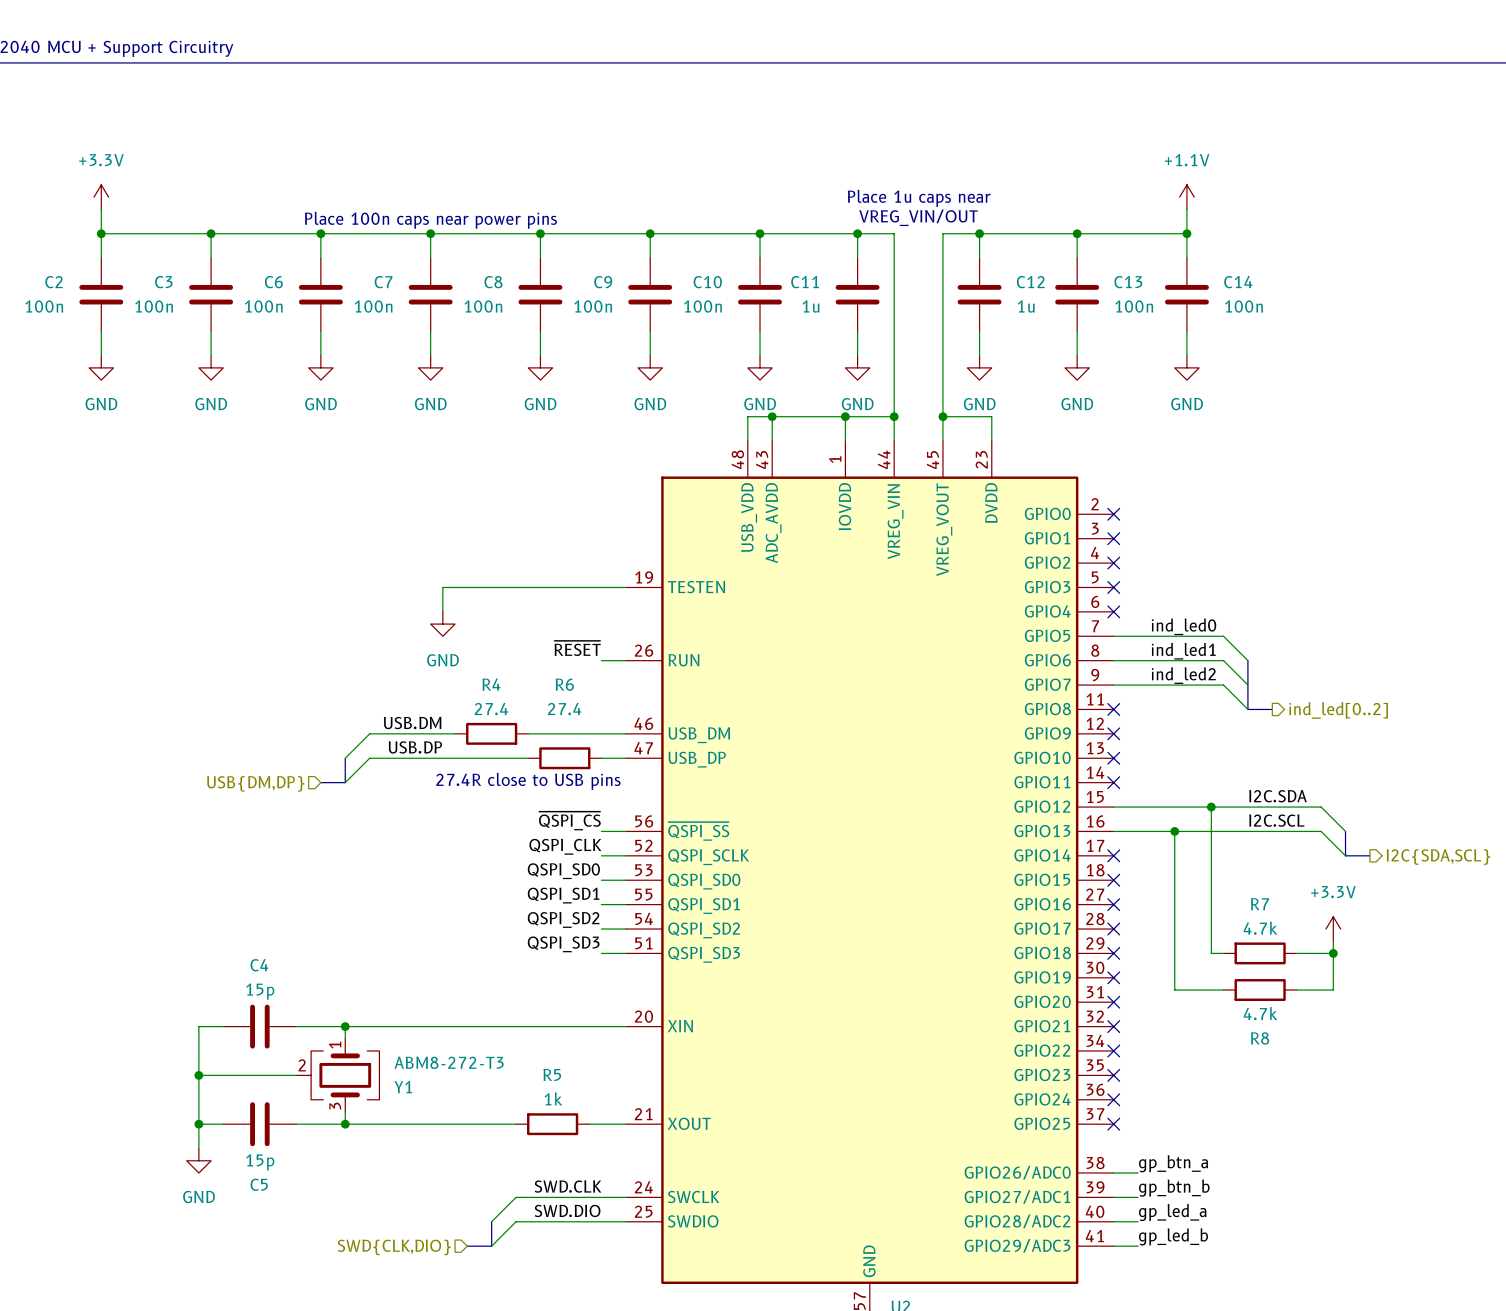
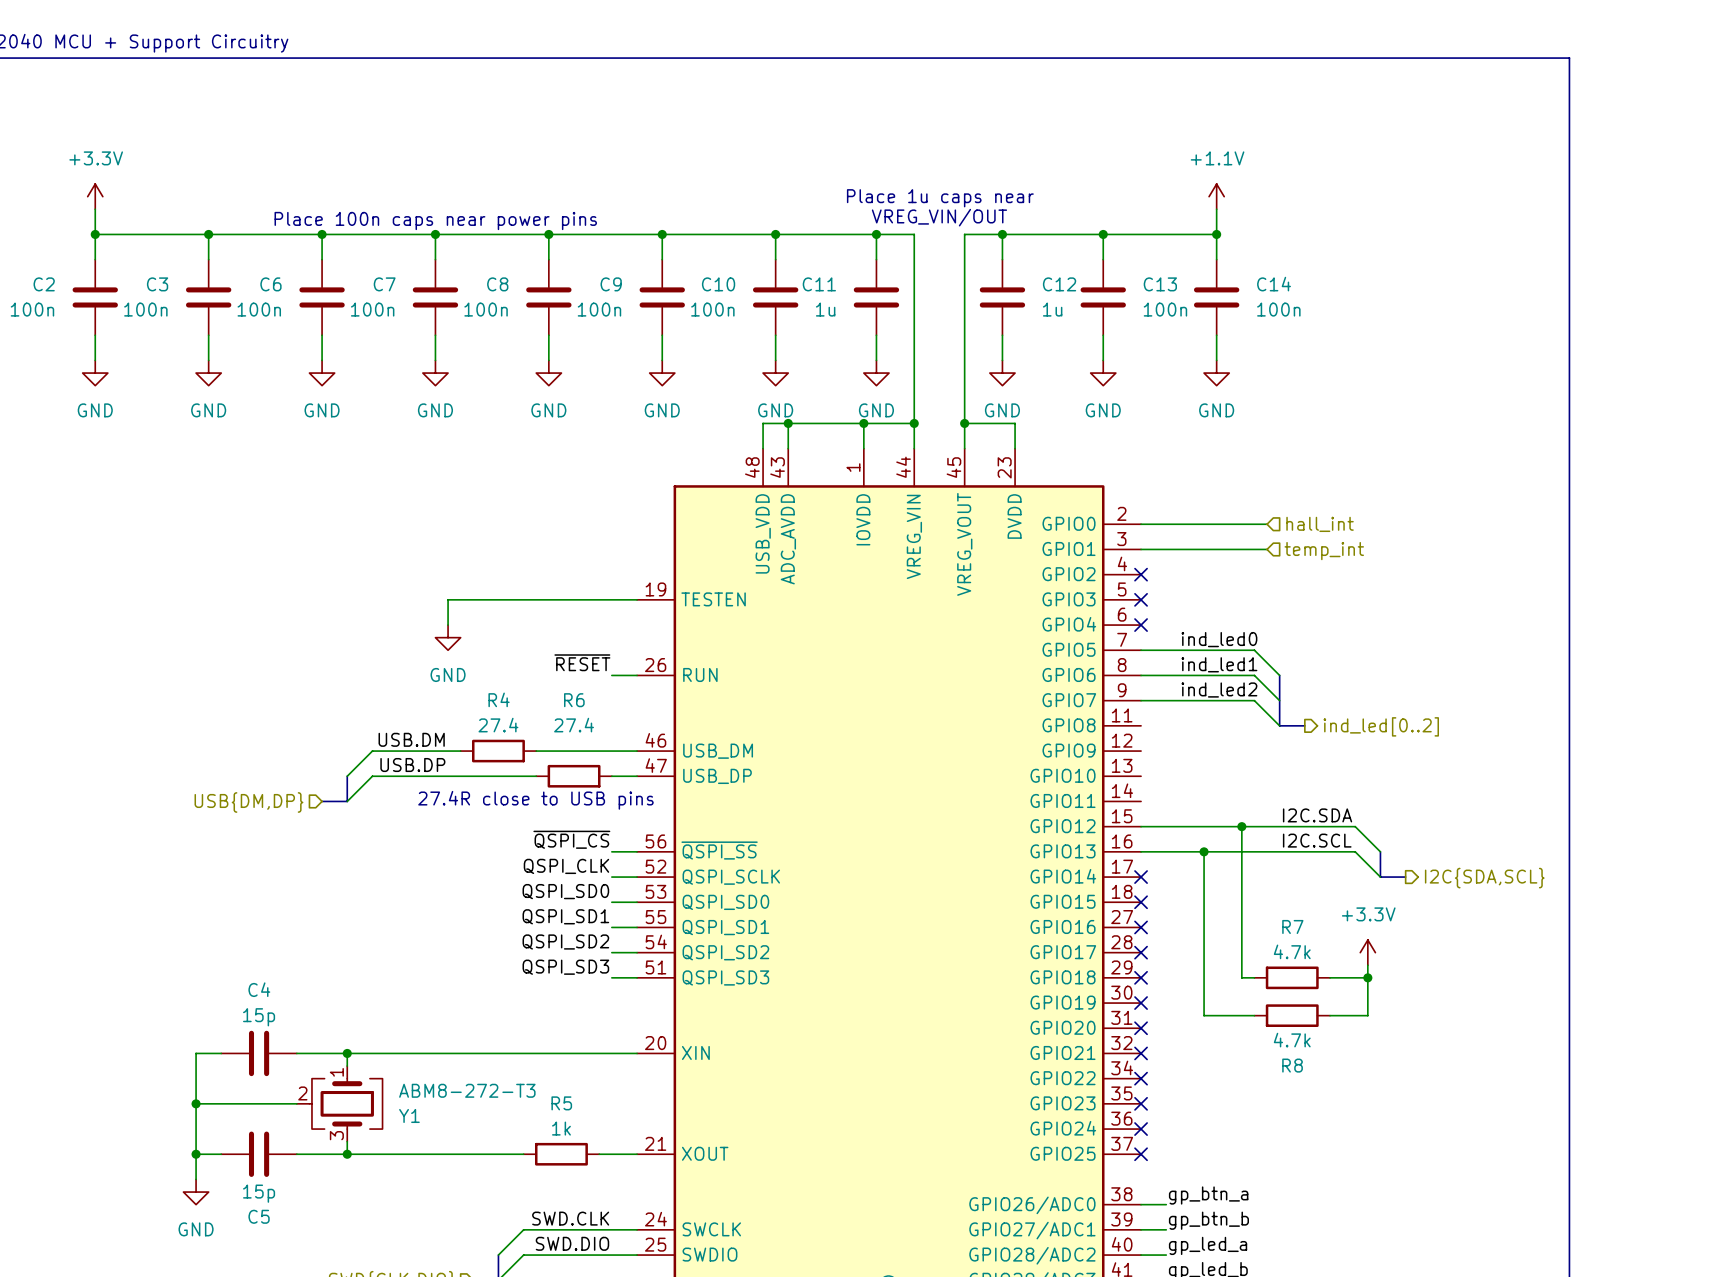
wire: none -> (1141, 524) (1267, 524)
no-connect mark: (1113, 514) -> none
hierarchical label: none -> hall_int (1320, 524)
wire: none -> (1141, 549) (1267, 549)
no-connect mark: (1113, 538) -> none
hierarchical label: none -> temp_int (1324, 551)
no-connect mark: (1113, 709) -> none
no-connect mark: (1113, 733) -> none
no-connect mark: (1113, 758) -> none
no-connect mark: (1113, 782) -> none

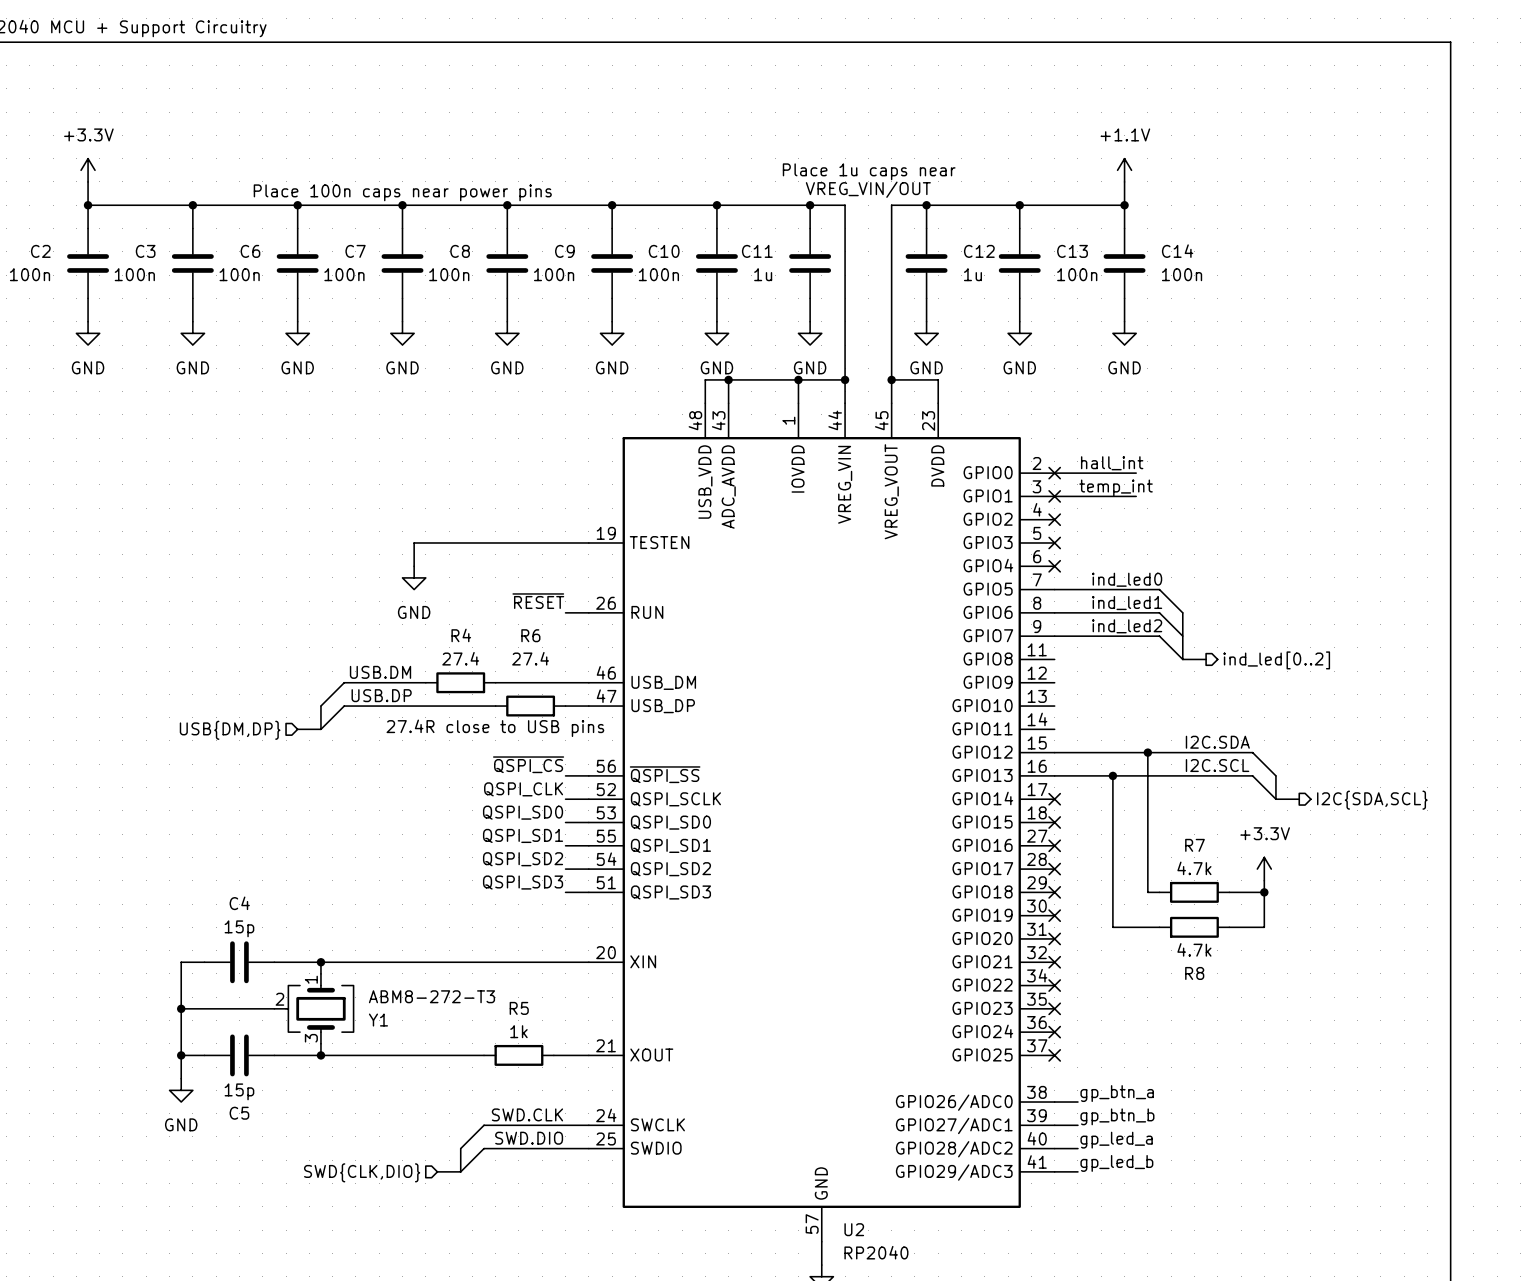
label: none -> hall_int (1112, 463)
no-connect mark: none -> (1054, 473)
wire: (1229, 524) (1267, 524) -> none
hierarchical label: hall_int (1320, 524) -> none
label: none -> temp_int (1116, 487)
no-connect mark: none -> (1054, 496)
wire: (1229, 549) (1267, 549) -> none
hierarchical label: temp_int (1324, 551) -> none

